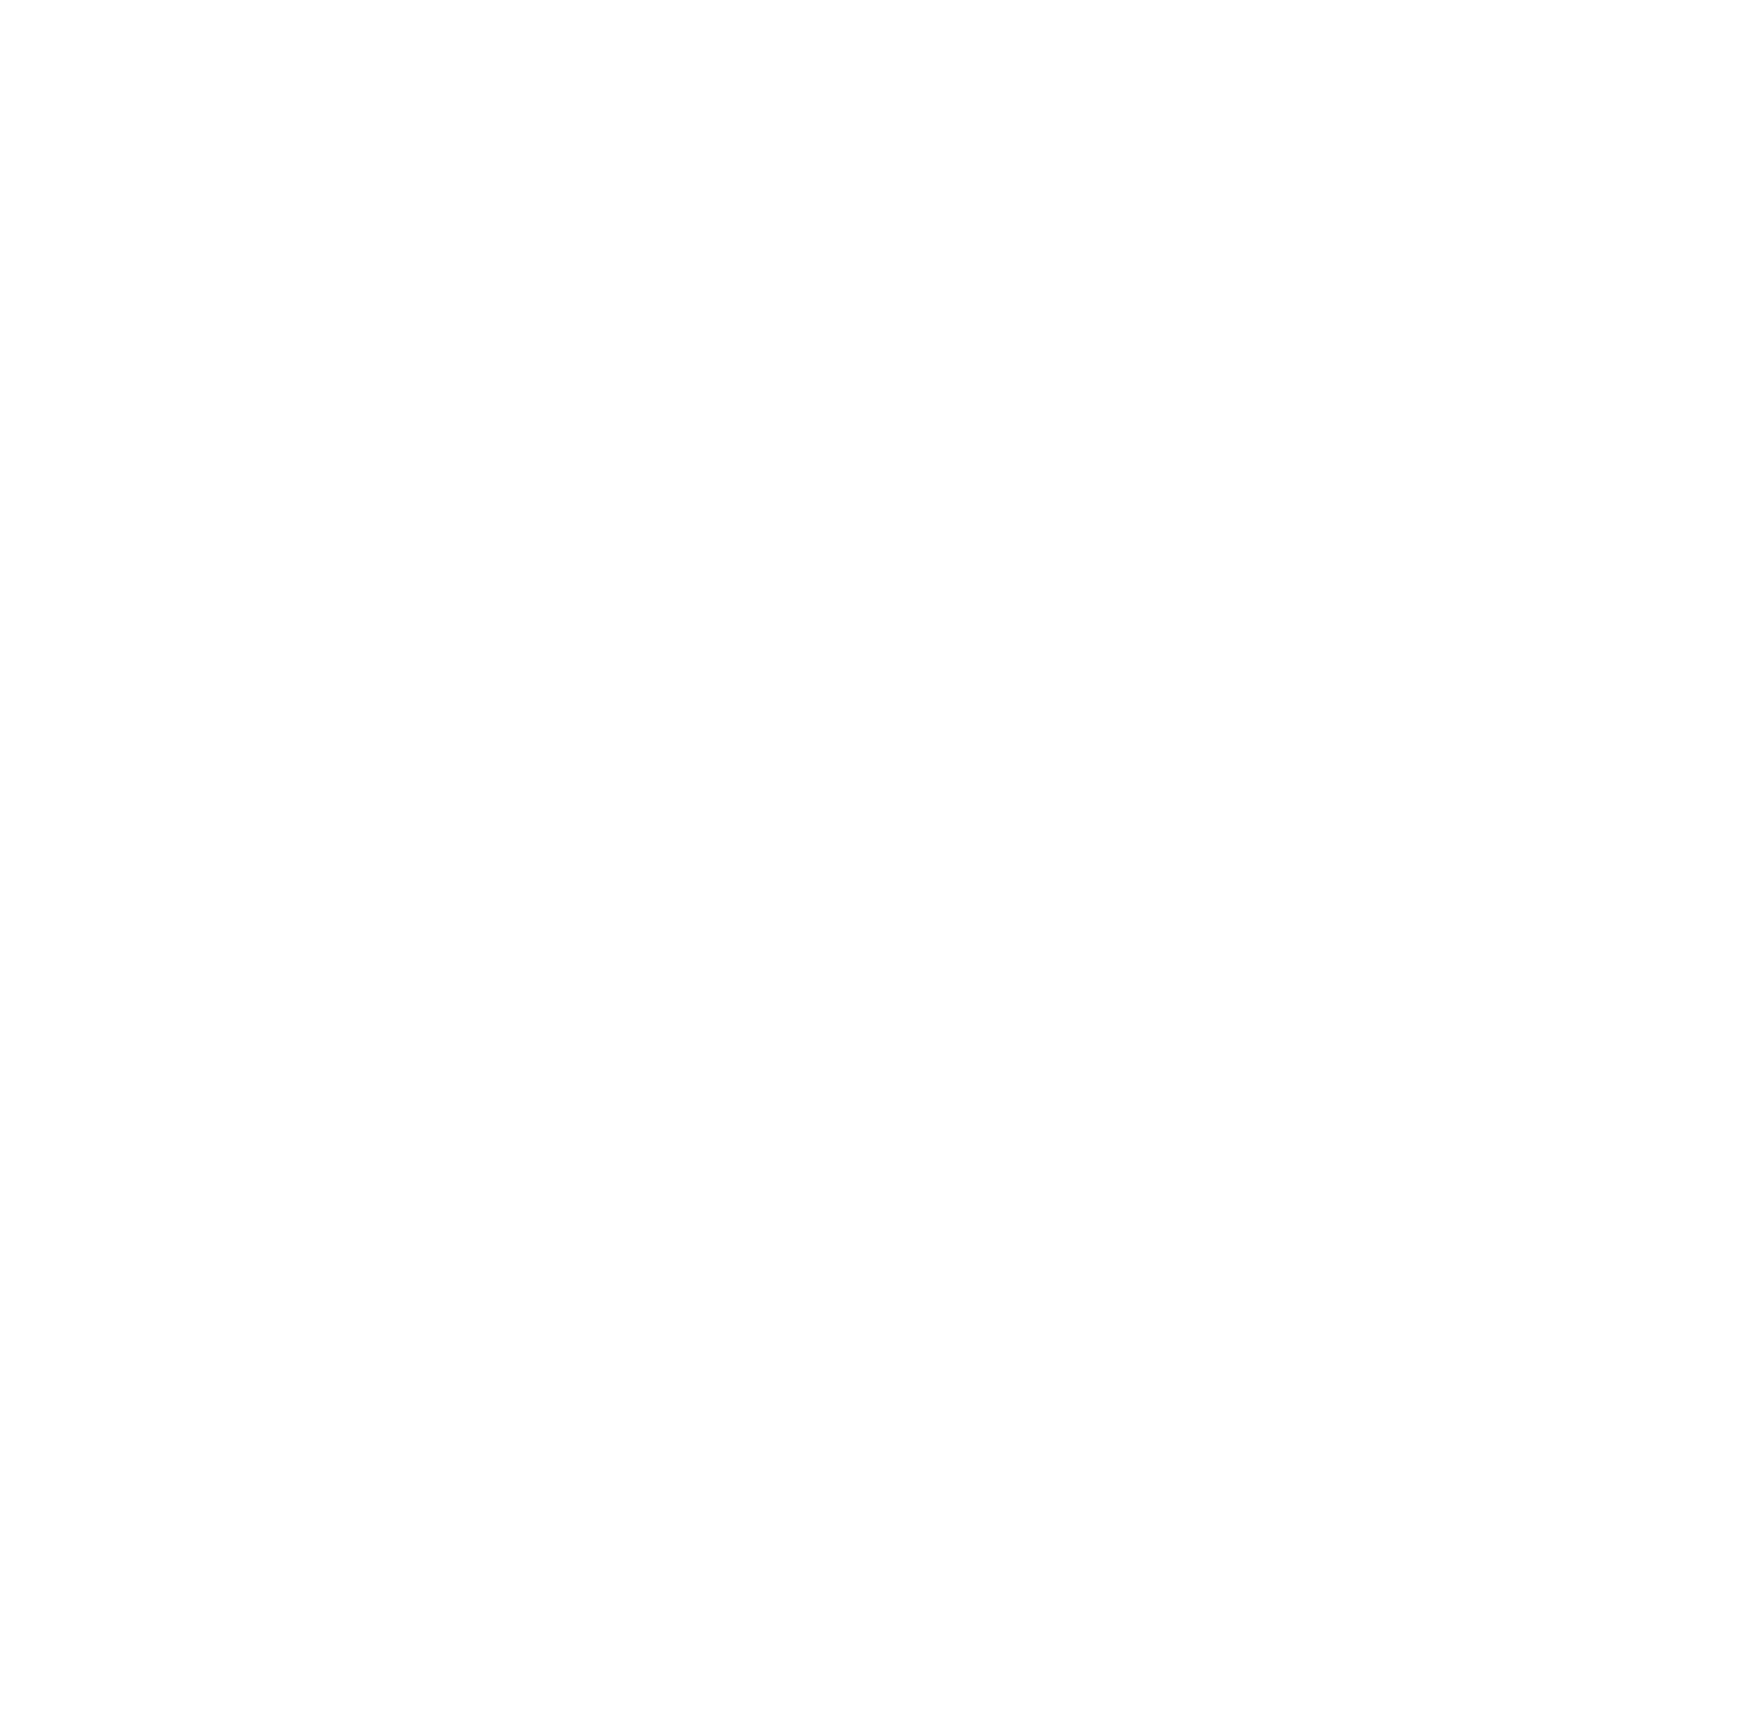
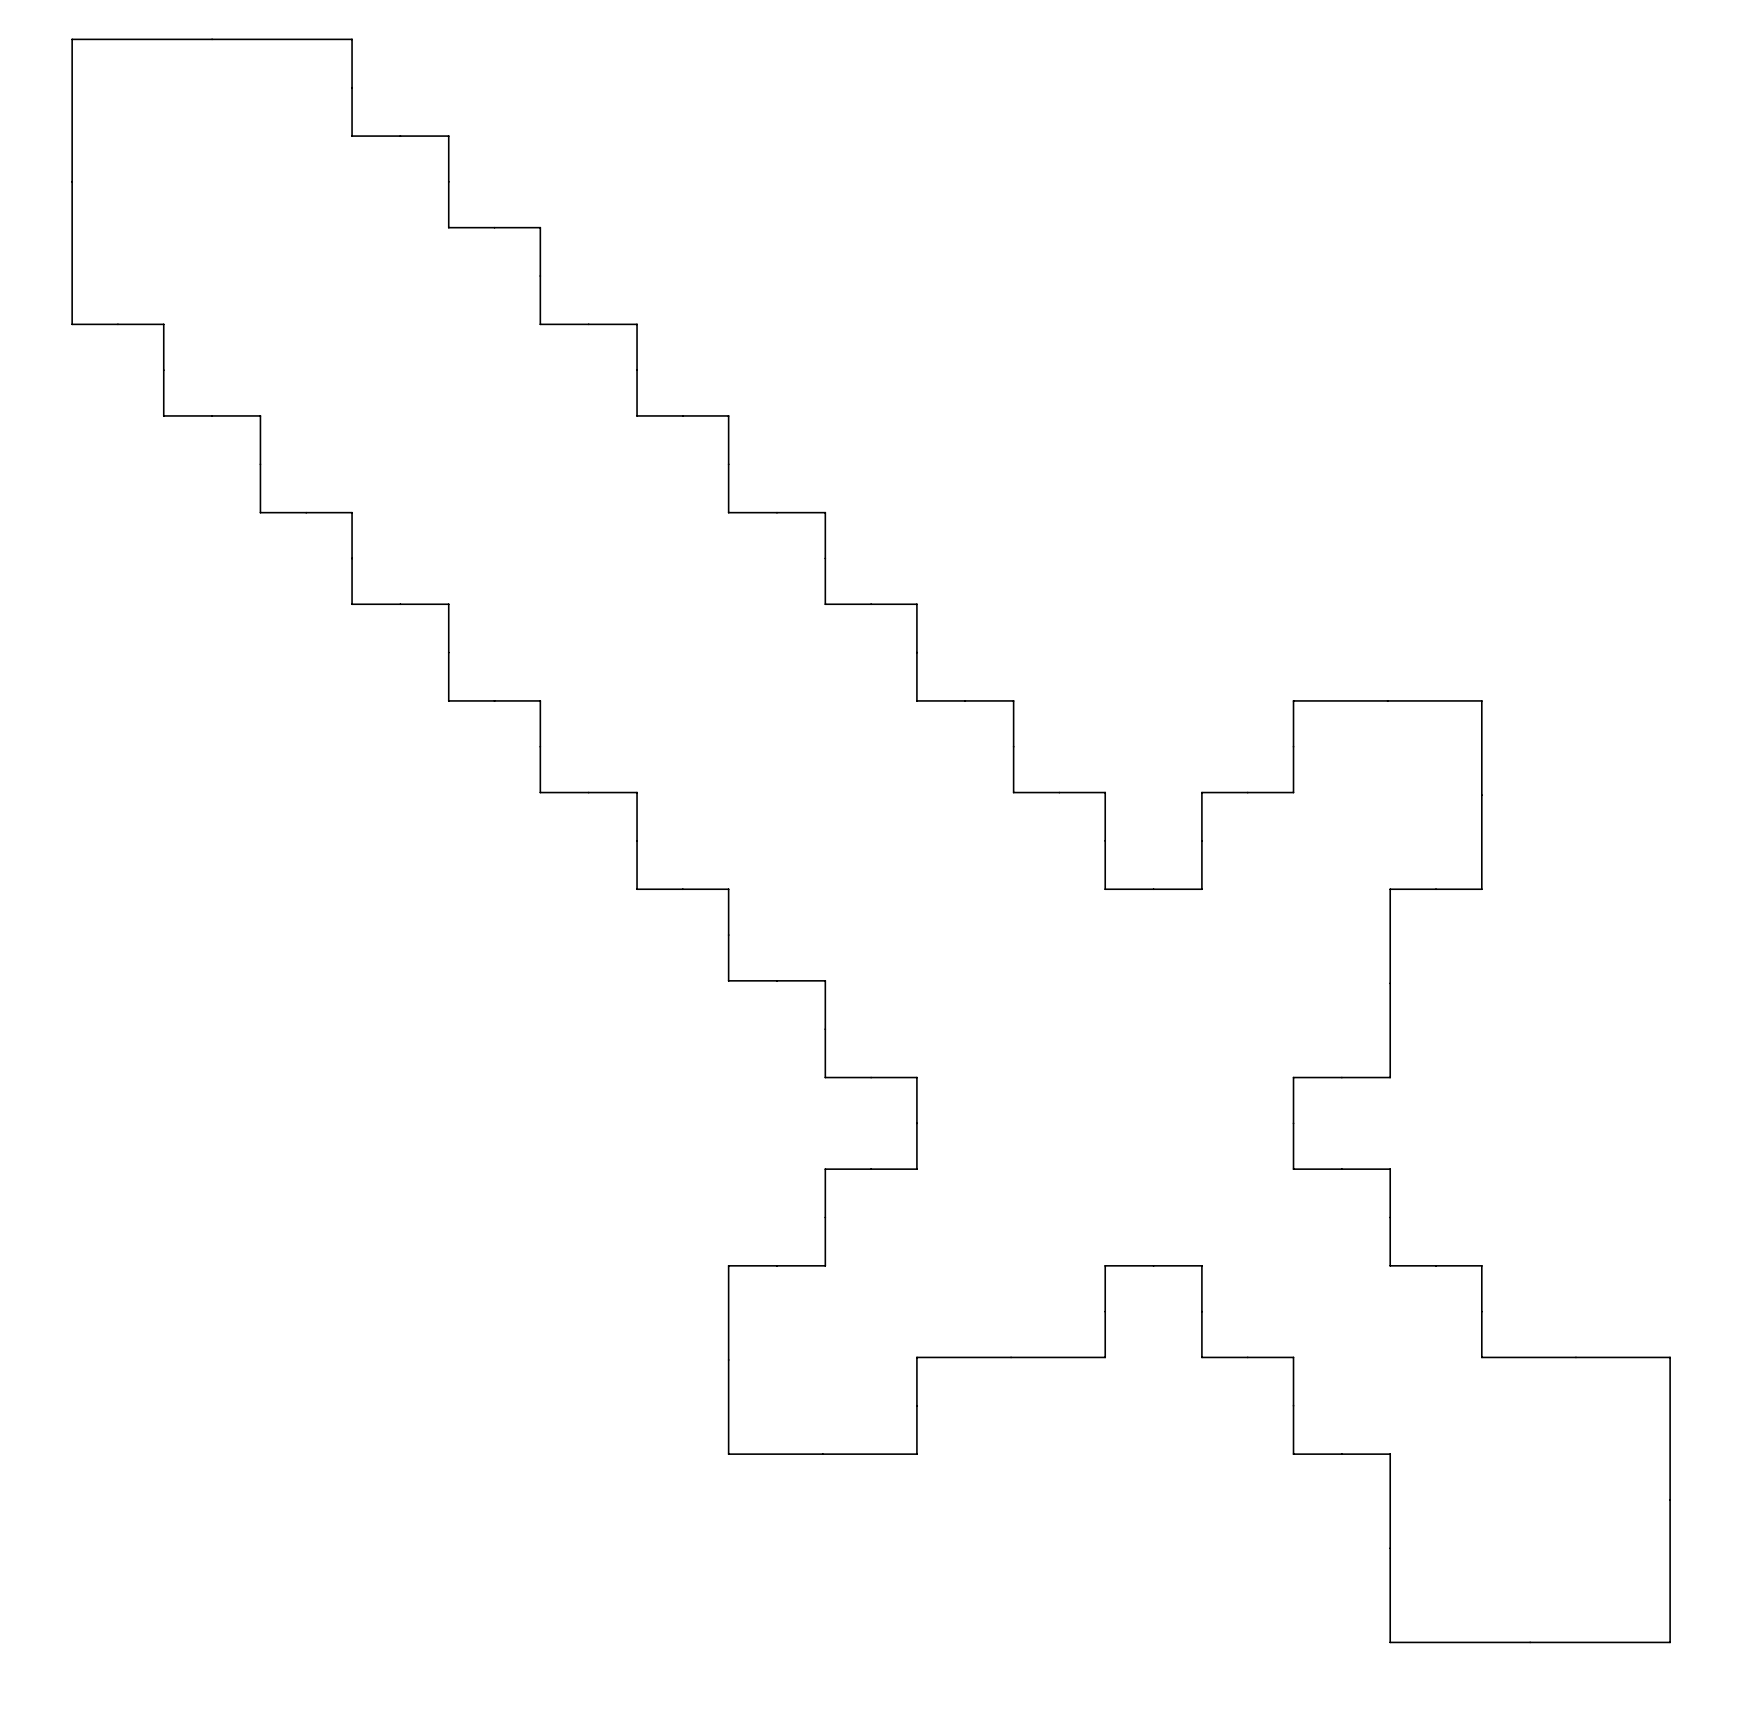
board edge: none -> (352, 39) (352, 136) (448, 136) (448, 227) (540, 227) (540, 324) (637, 324) (637, 415) (728, 415) (728, 512) (825, 512) (825, 604) (916, 604) (916, 700) (1013, 700) (1013, 792) (1105, 792) (1105, 889) (1201, 889) (1201, 792) (1293, 792) (1293, 700) (1481, 700) (1481, 889) (1390, 889) (1390, 1077) (1293, 1077) (1293, 1169) (1390, 1169) (1390, 1265) (1481, 1265) (1481, 1357) (1670, 1357) (1670, 1642) (1390, 1642) (1390, 1454) (1293, 1454) (1293, 1357) (1201, 1357) (1201, 1265) (1105, 1265) (1105, 1357) (916, 1357) (916, 1454) (728, 1454) (728, 1265) (825, 1265) (825, 1169) (916, 1169) (916, 1077) (825, 1077) (825, 980) (728, 980) (728, 889) (637, 889) (637, 792) (540, 792) (540, 700) (448, 700) (448, 604) (352, 604) (352, 512) (260, 512) (260, 415) (163, 415) (163, 324) (72, 324) (72, 39) (352, 39)

